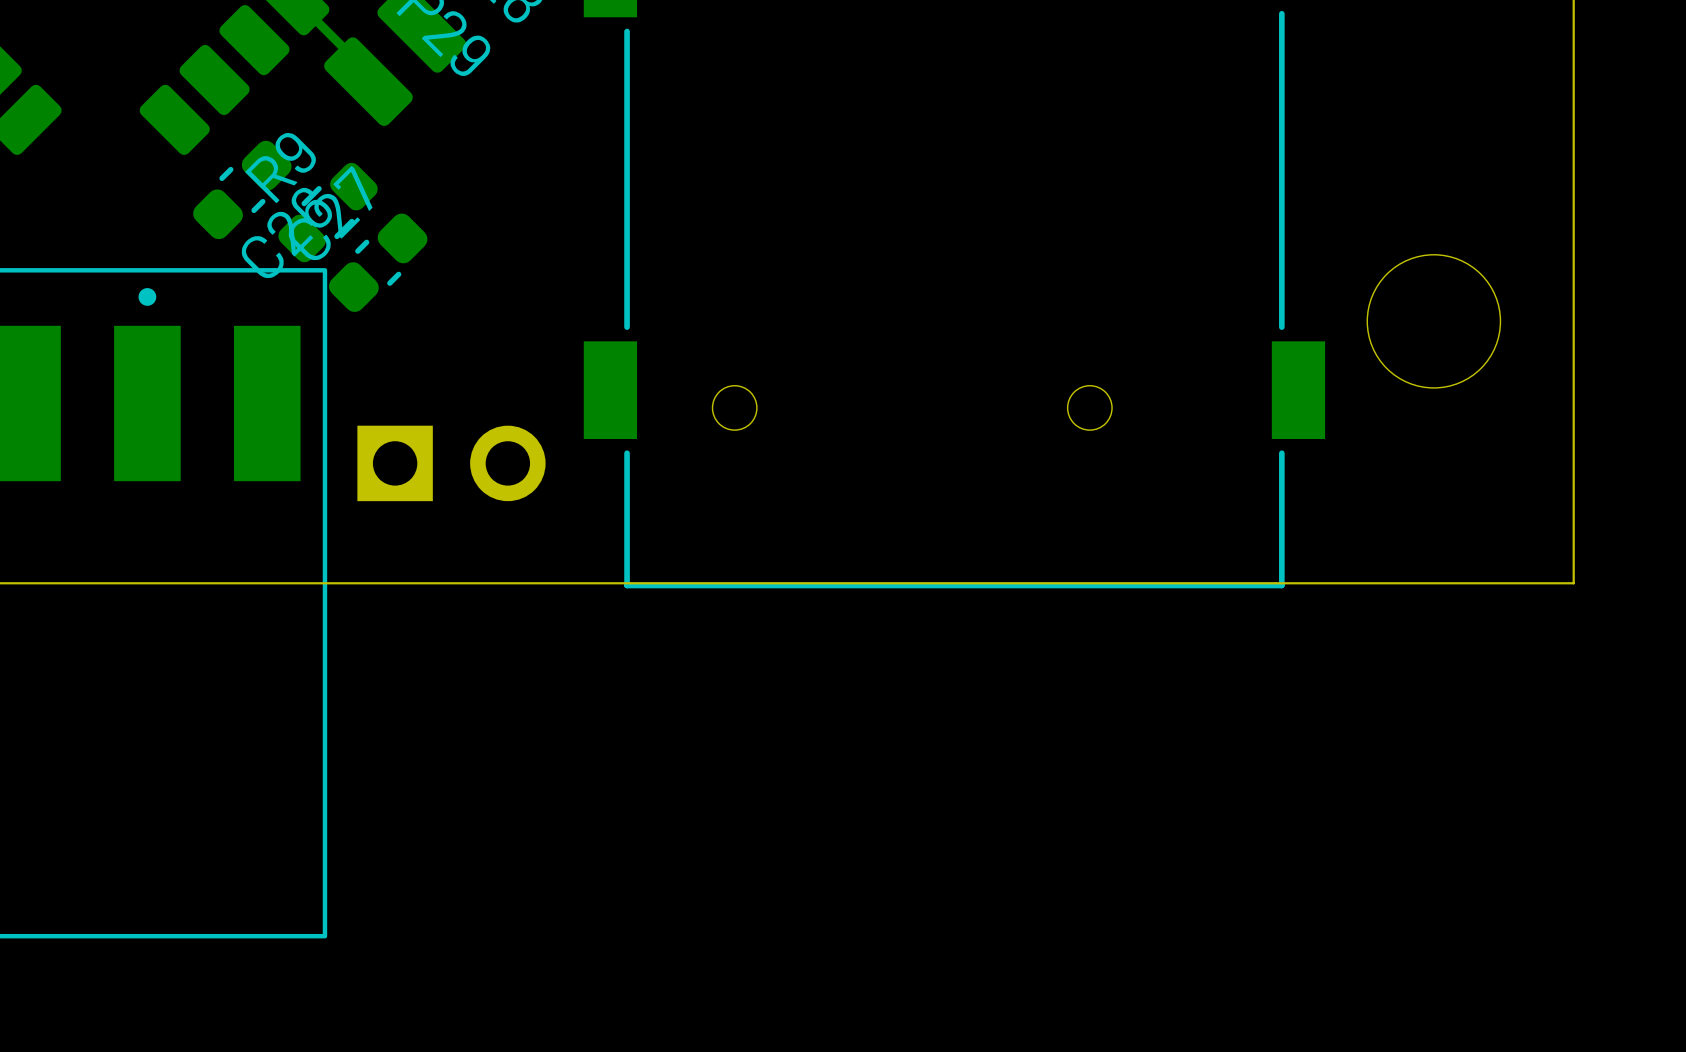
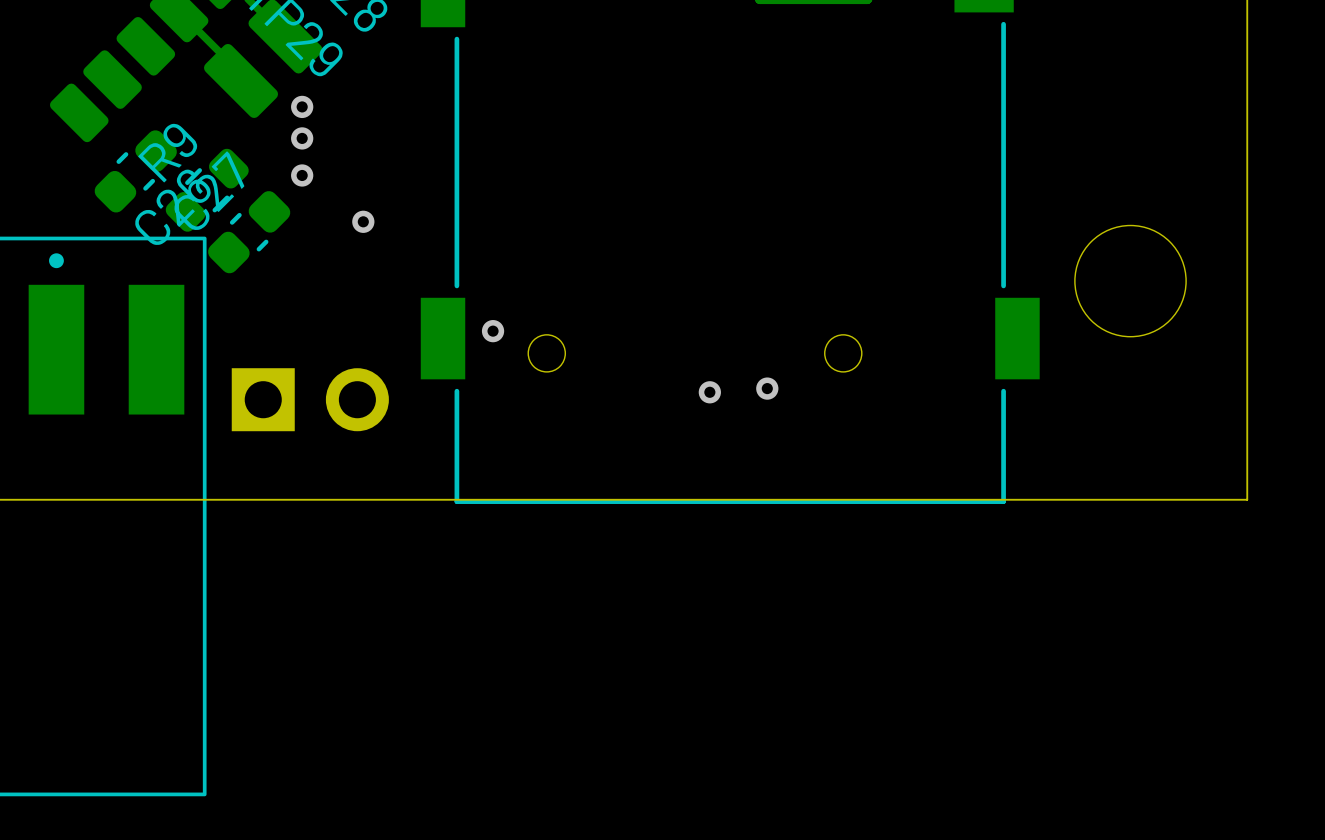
via: none -> (302, 106)
via: none -> (302, 138)
via: none -> (302, 175)
via: none -> (363, 221)
via: none -> (493, 331)
via: none -> (767, 388)
via: none -> (709, 392)

